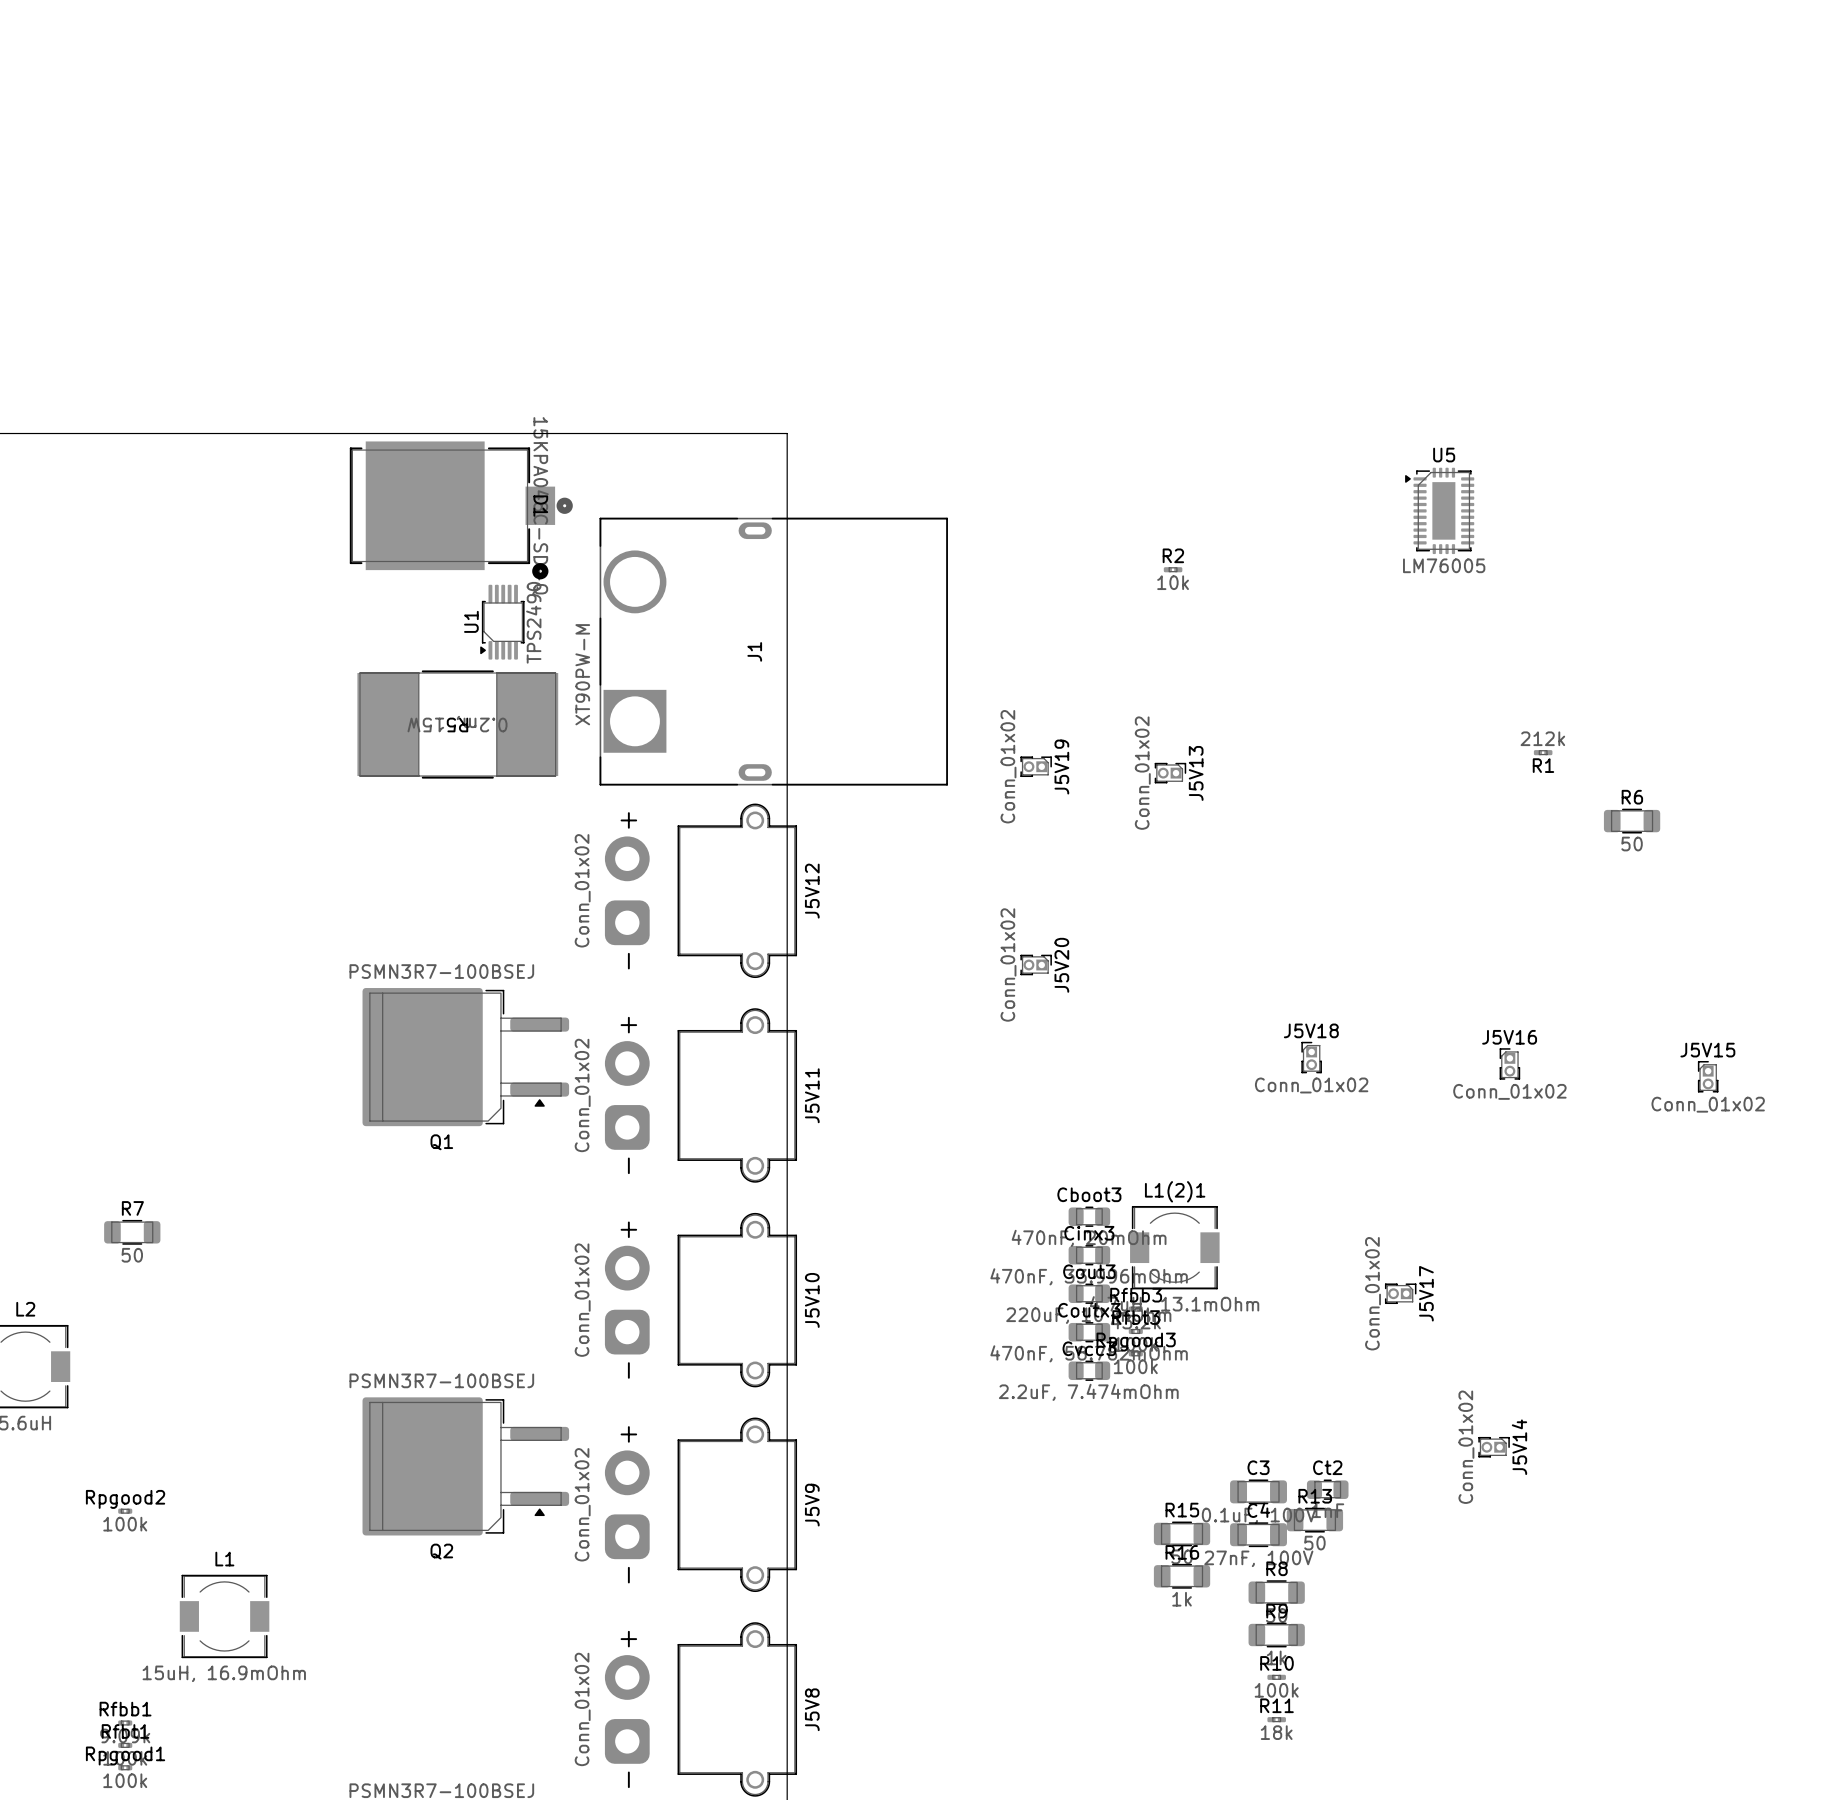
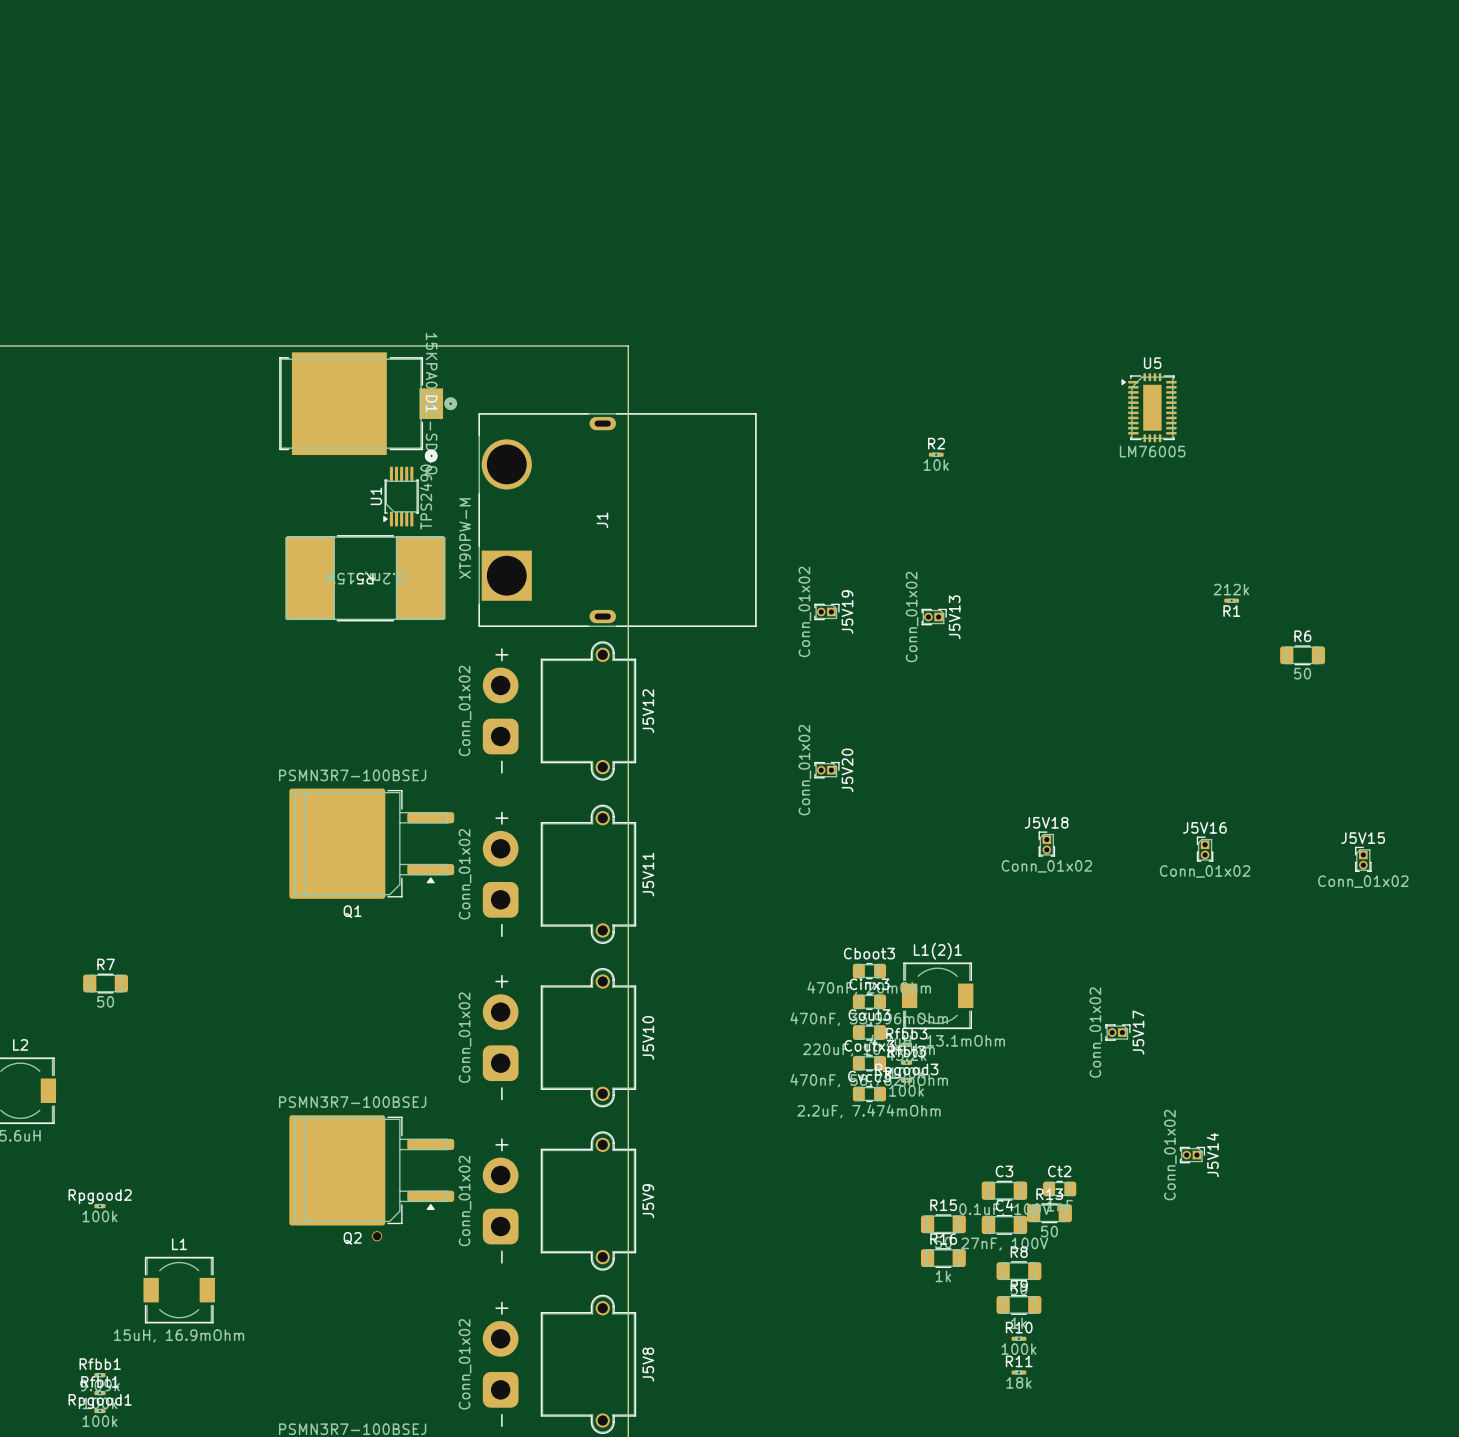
via: none -> (377, 1236)

